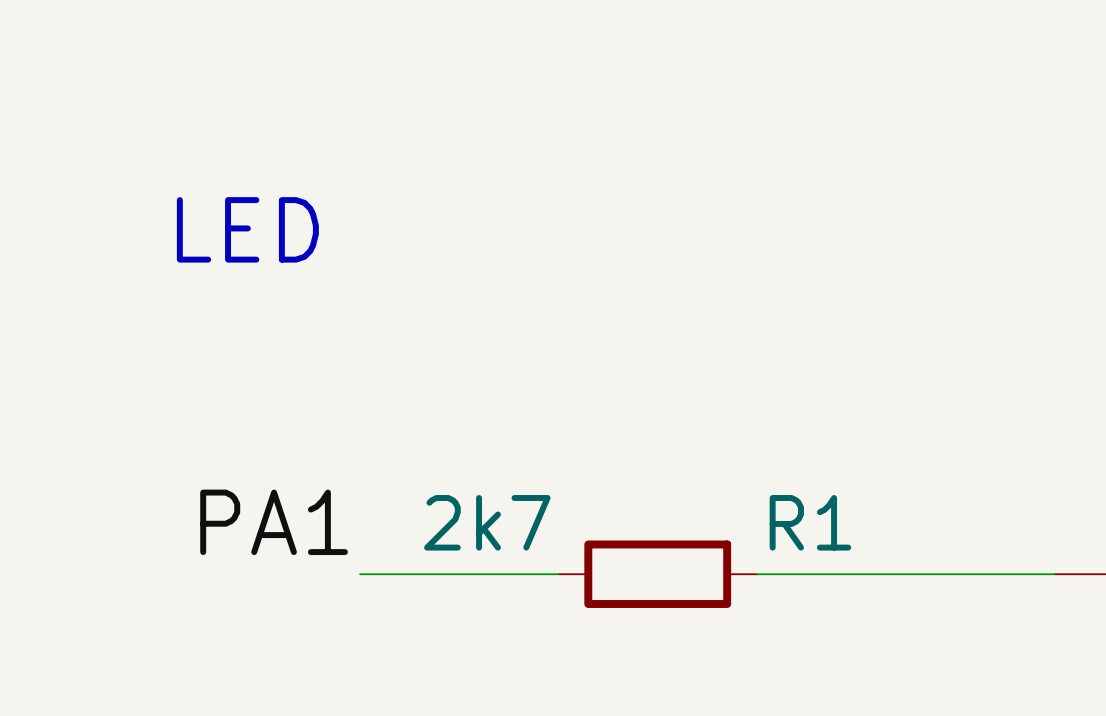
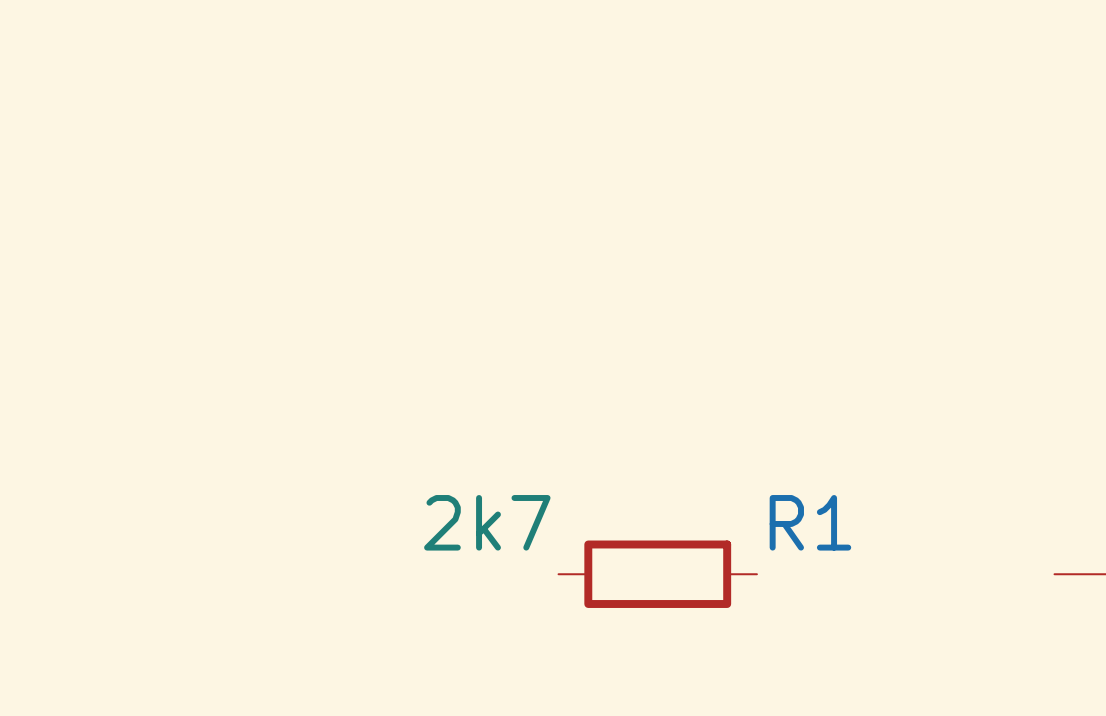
text: LED (247, 229) -> none
label: PA1 (274, 522) -> none
wire: (360, 574) (558, 574) -> none
wire: (756, 574) (1054, 574) -> none

